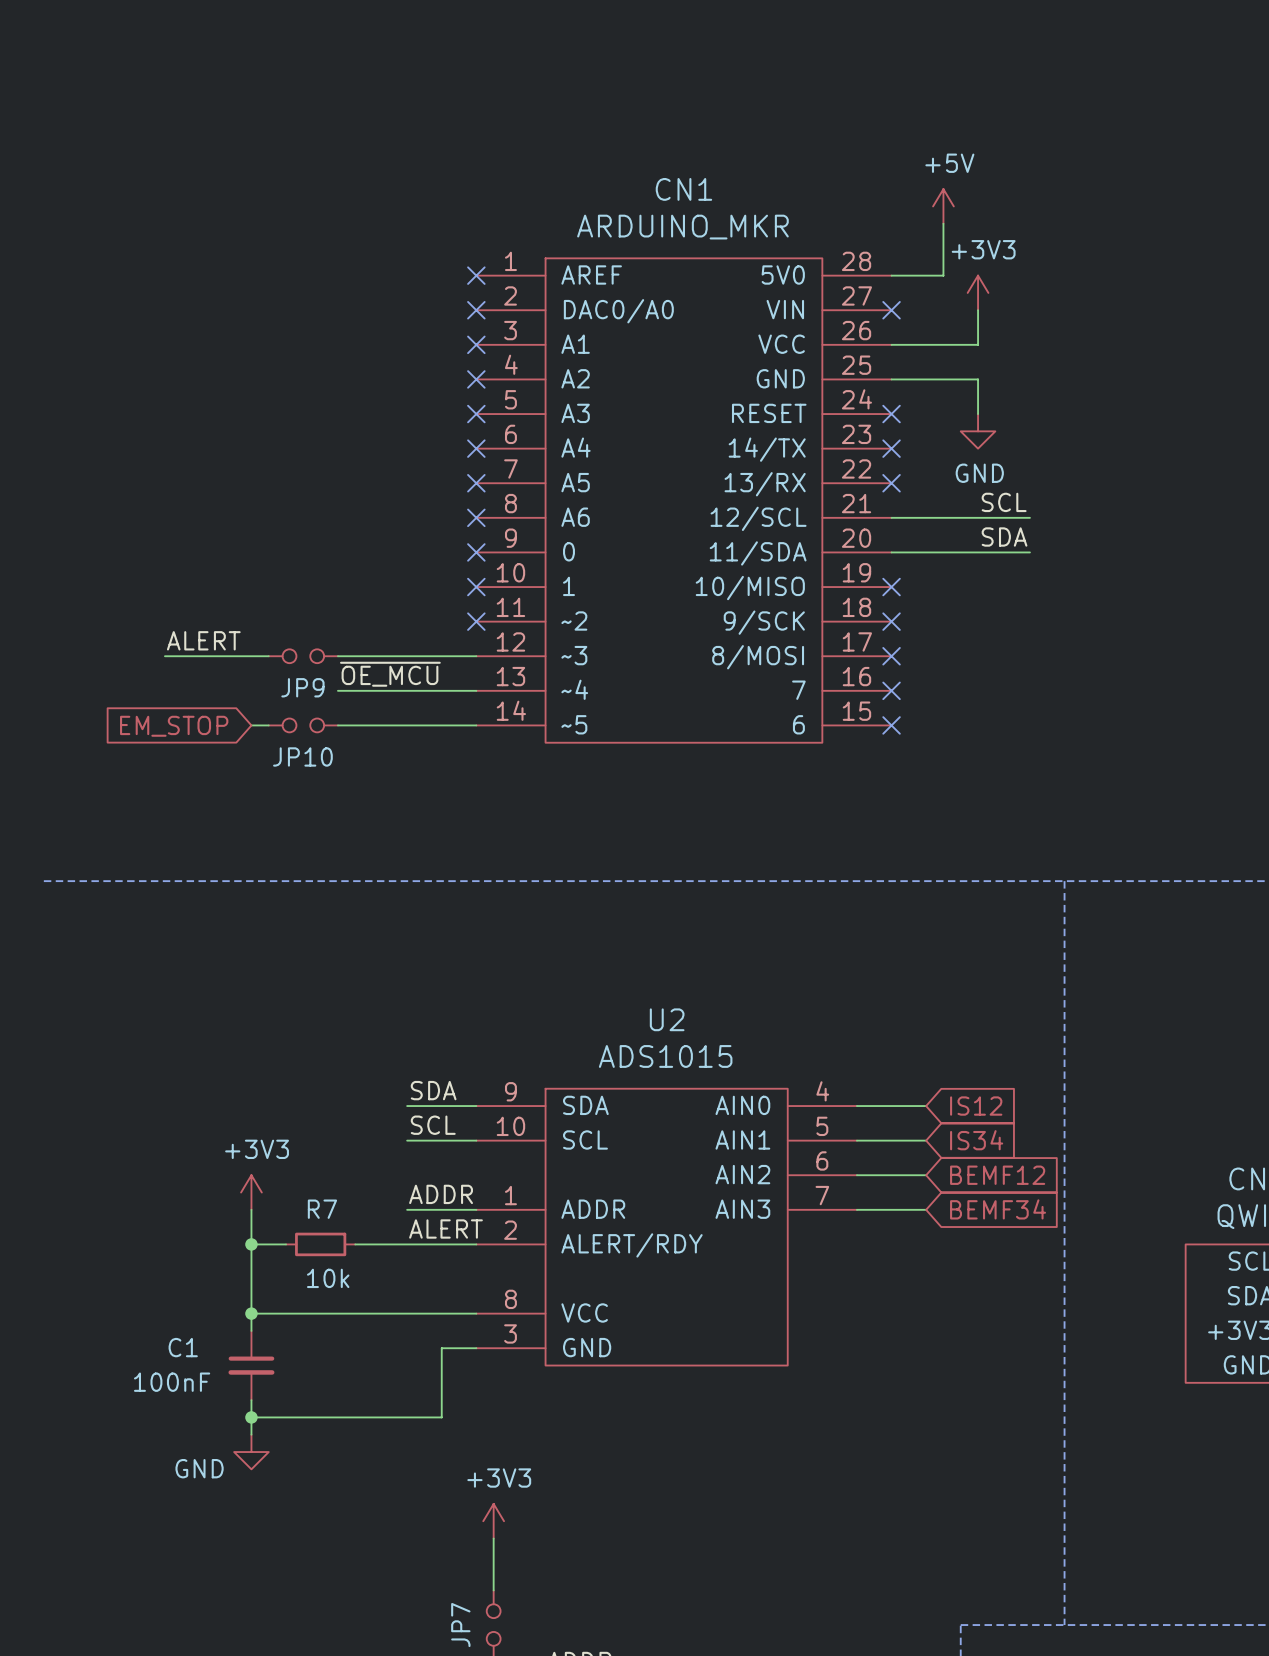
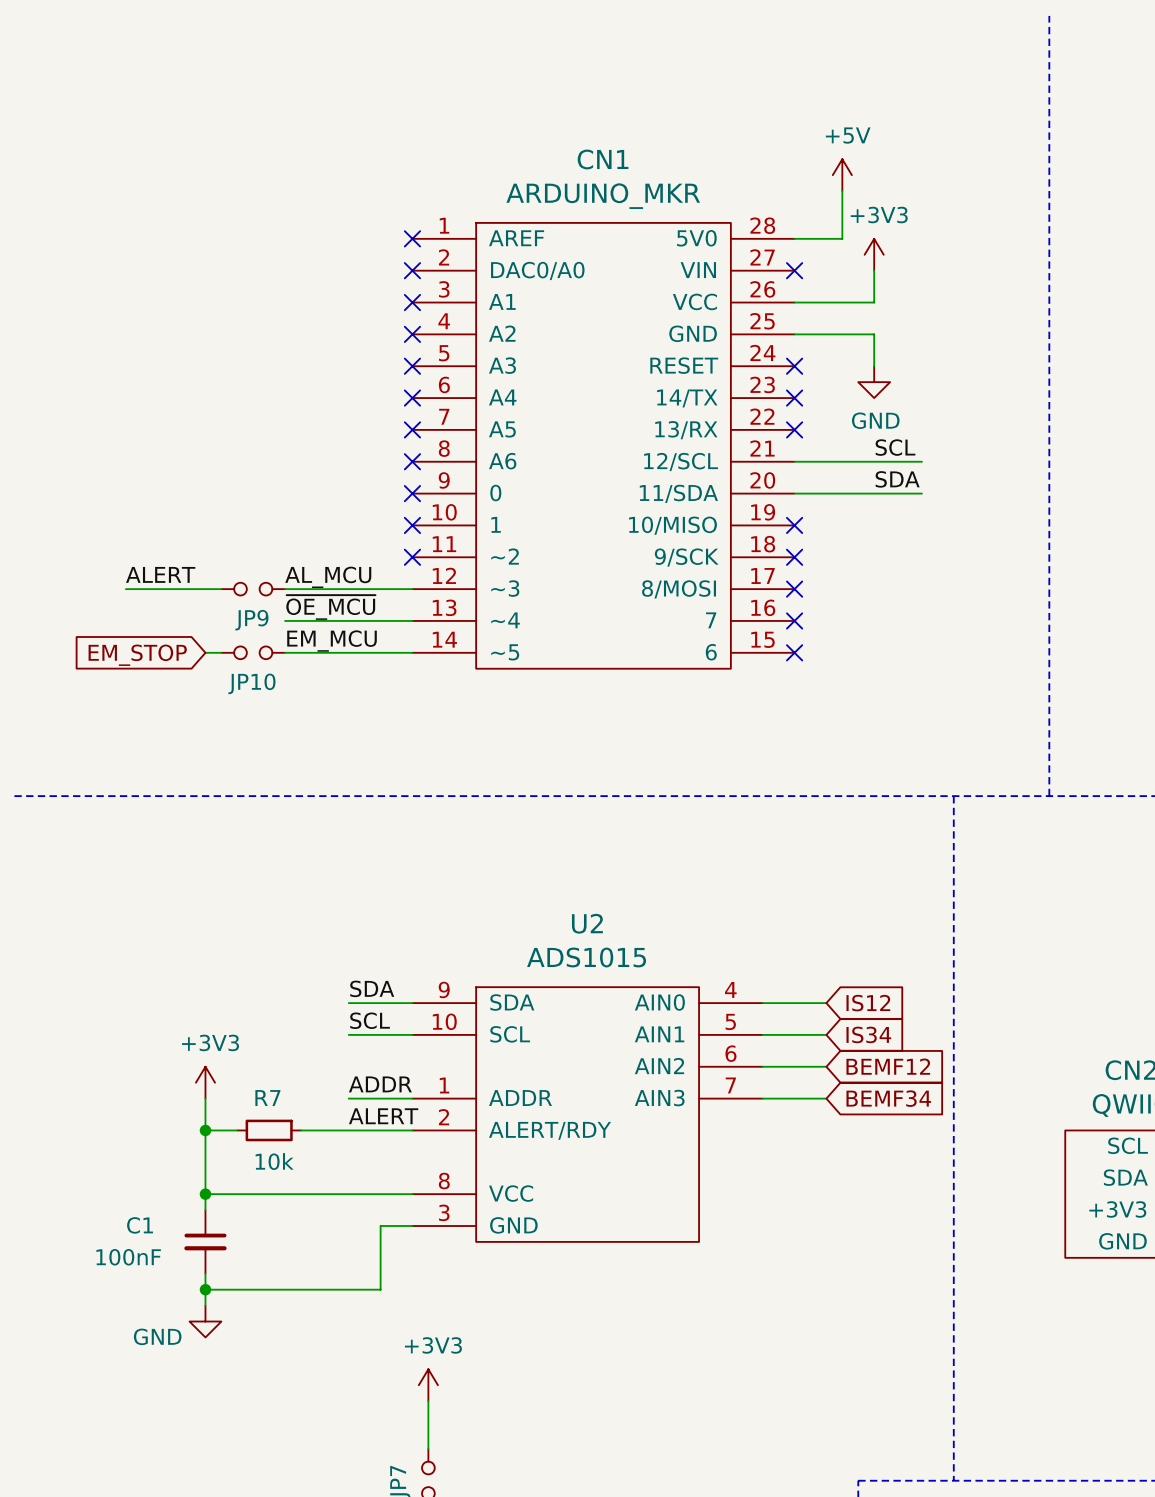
line: none -> (1049, 15) (1049, 796)
label: none -> AL_MCU (328, 577)
label: none -> EM_MCU (332, 641)

